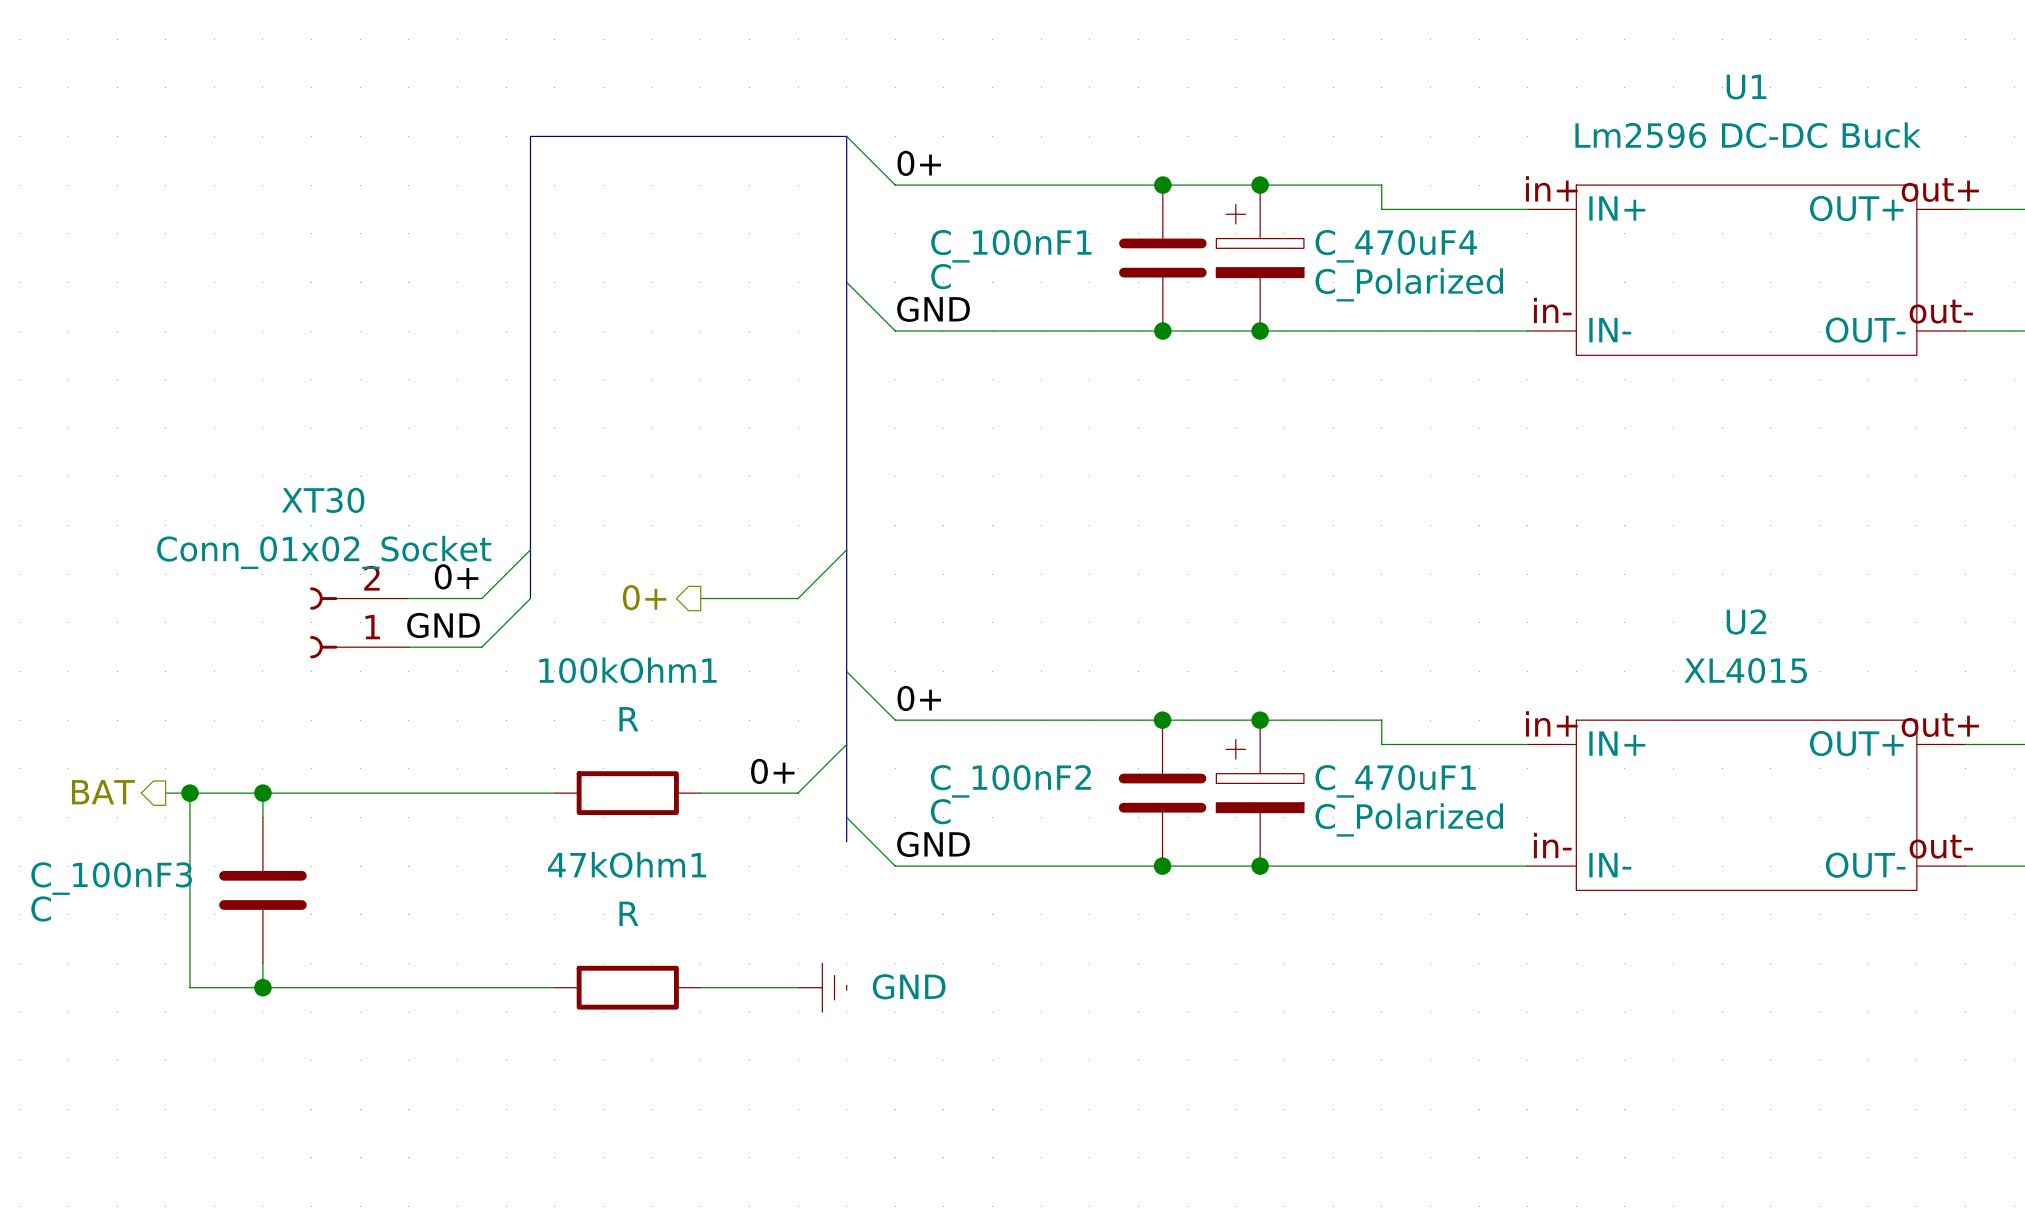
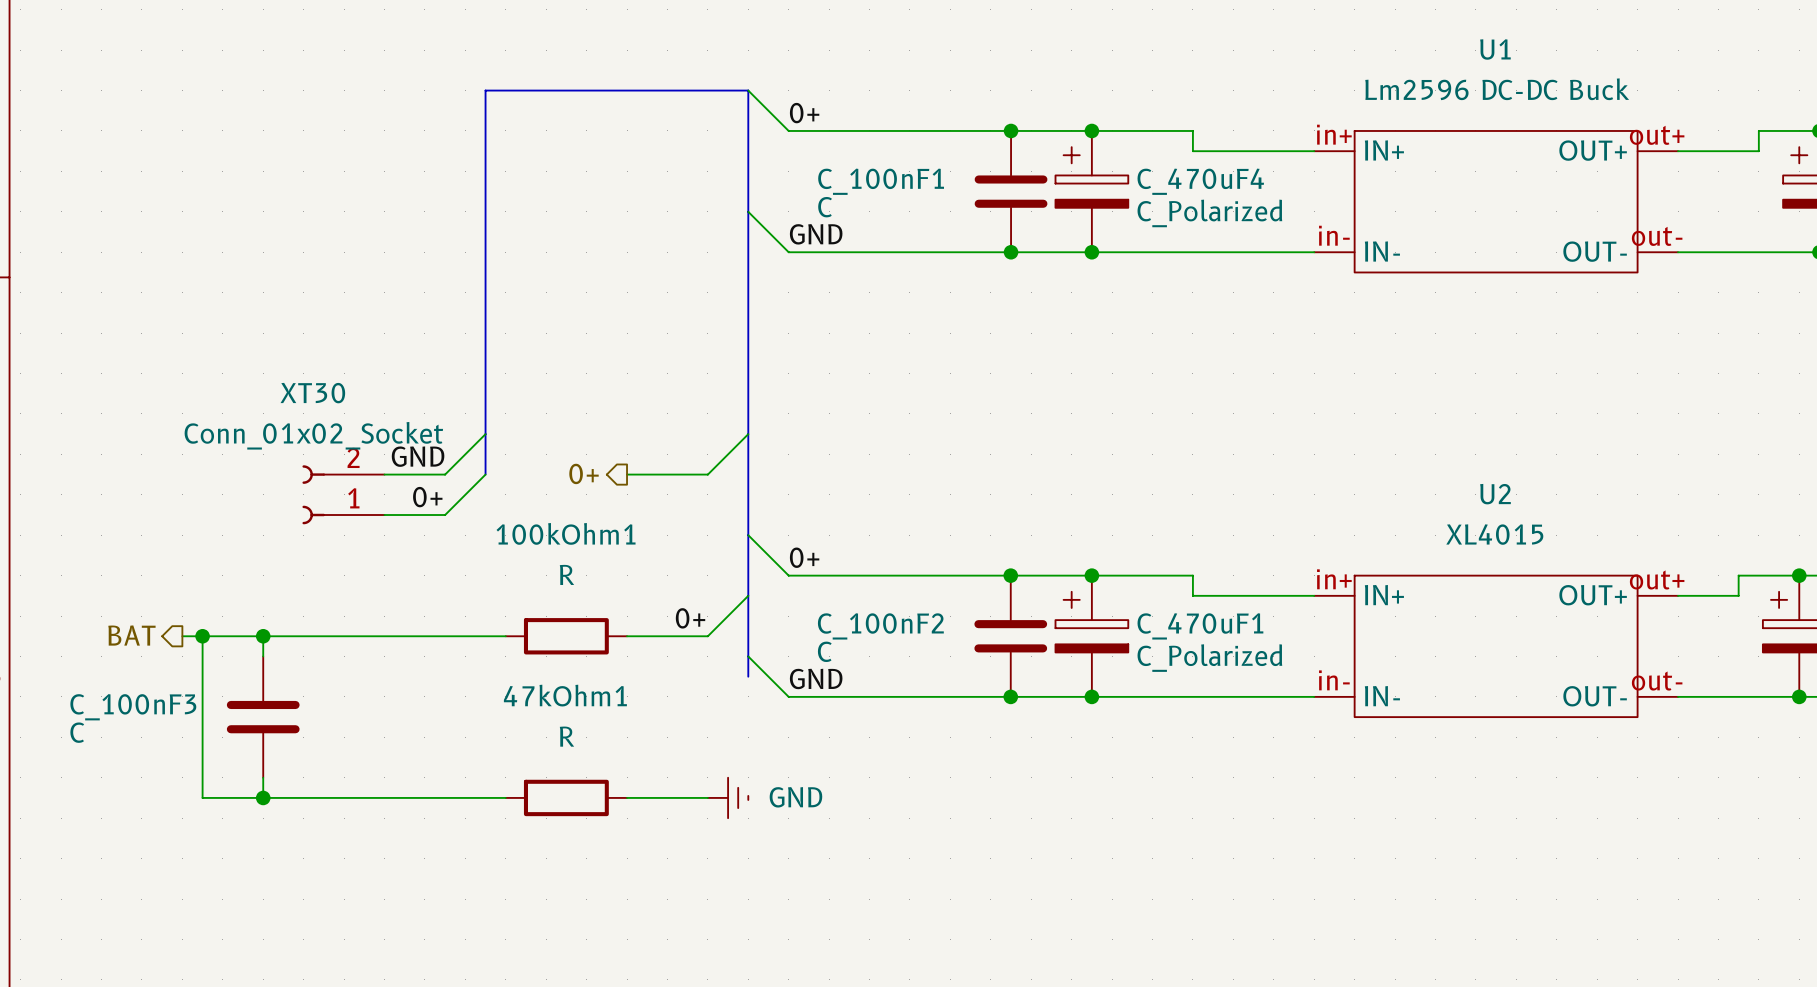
label: 0+ (456, 576) -> GND (418, 456)
label: GND (443, 625) -> 0+ (427, 497)

